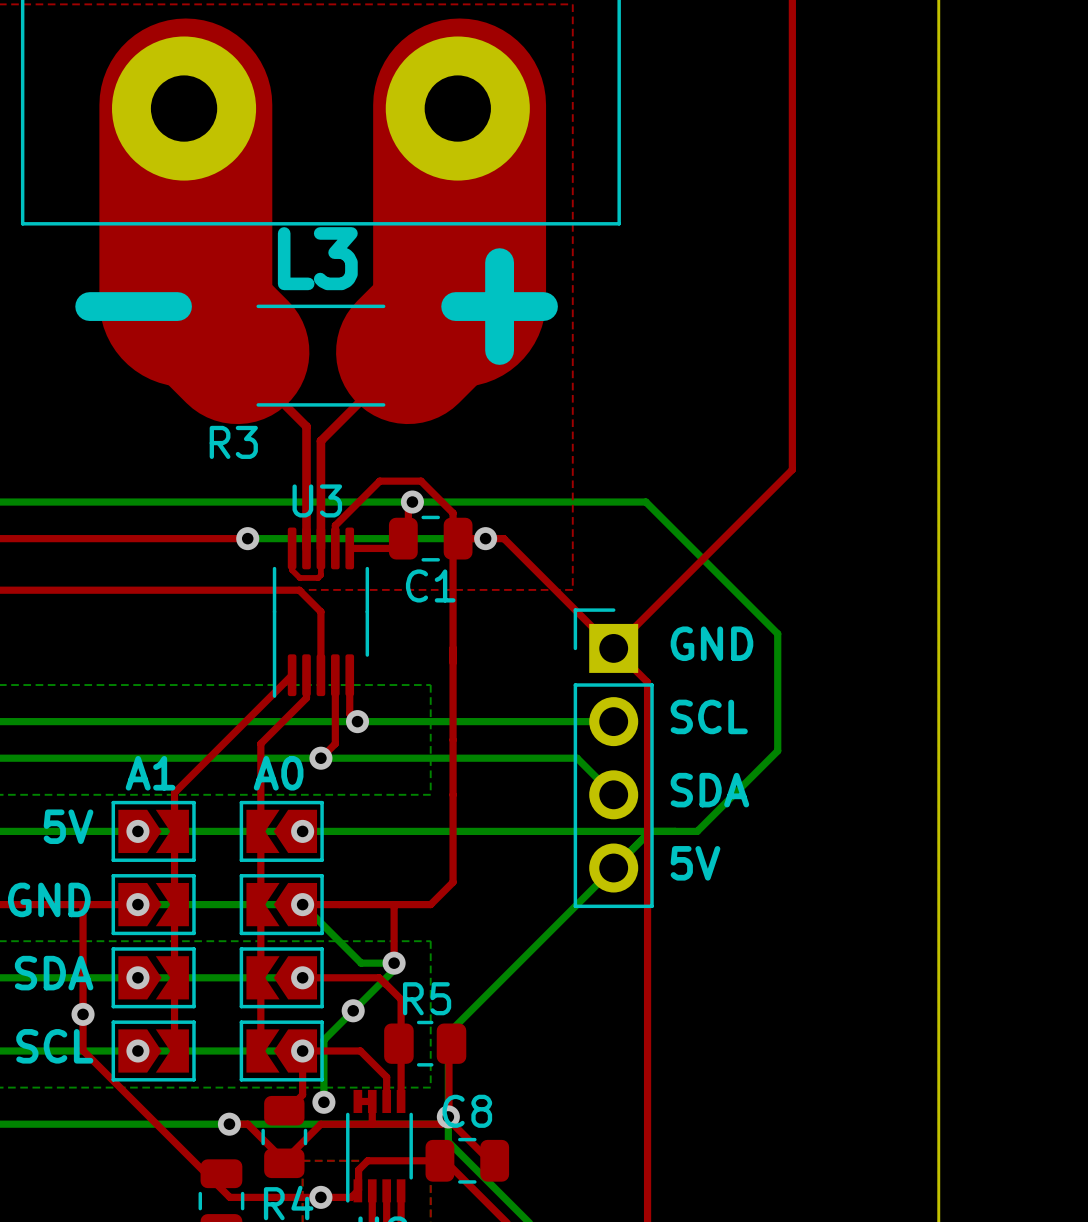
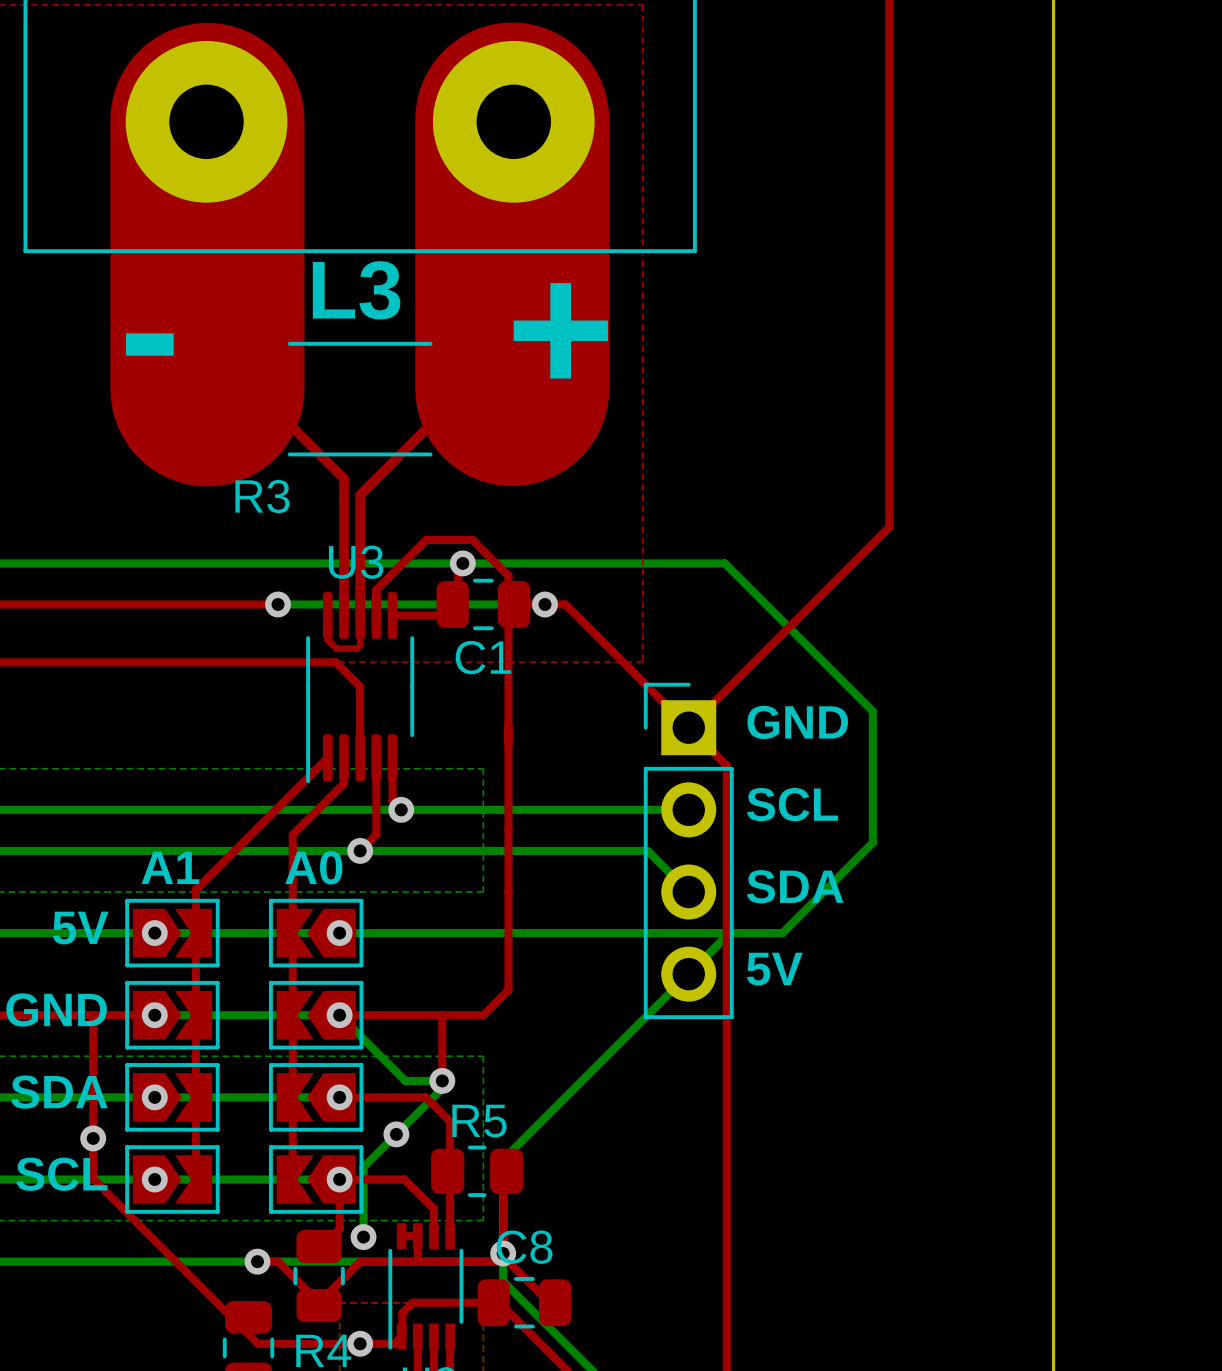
top track: (185, 104) (185, 300) (237, 352) -> none
top track: (459, 104) (459, 300) (408, 352) -> none
top track: none -> (207, 119) (207, 389)
top track: none -> (512, 119) (512, 389)

